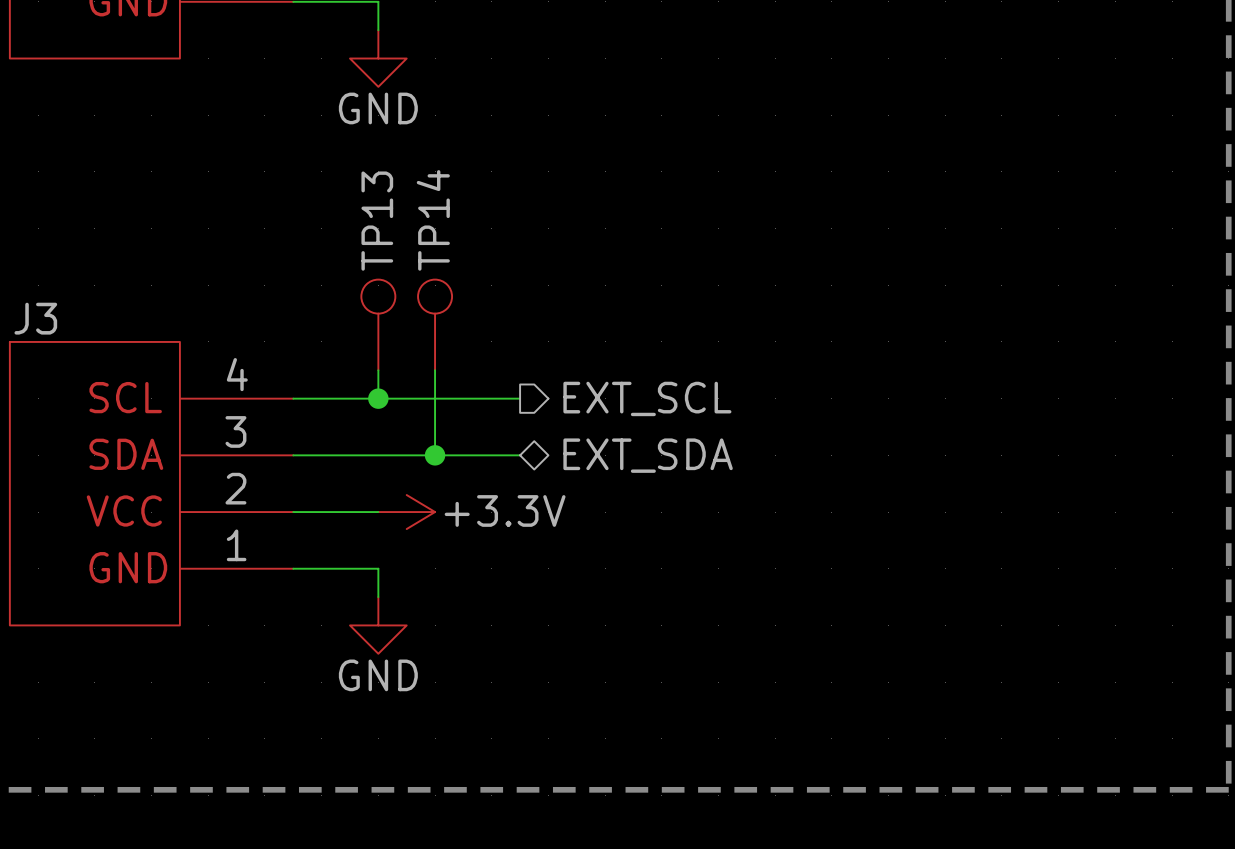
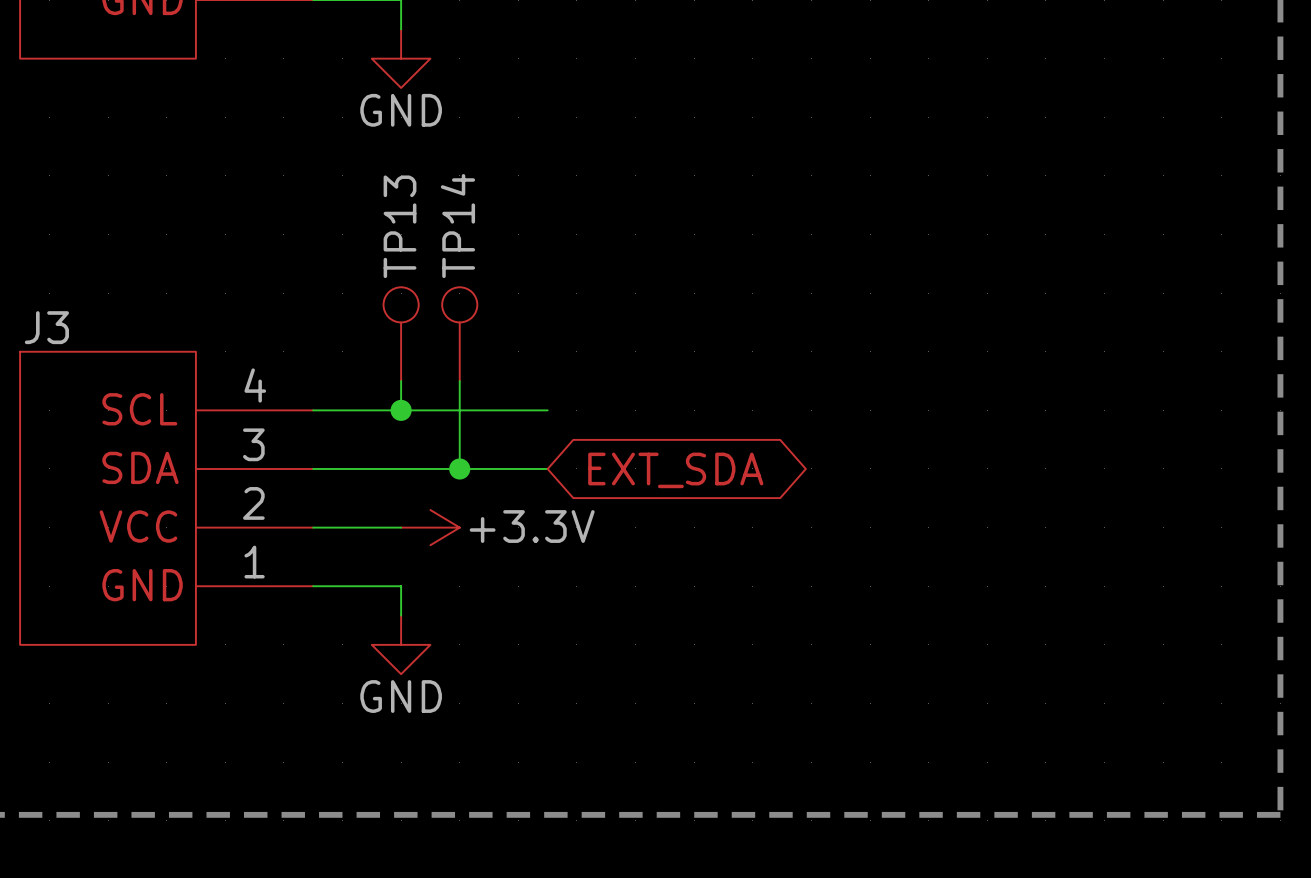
hierarchical label: EXT_SCL (647, 398) -> none
hierarchical label: EXT_SDA (648, 455) -> none
global label: none -> EXT_SDA (675, 470)

